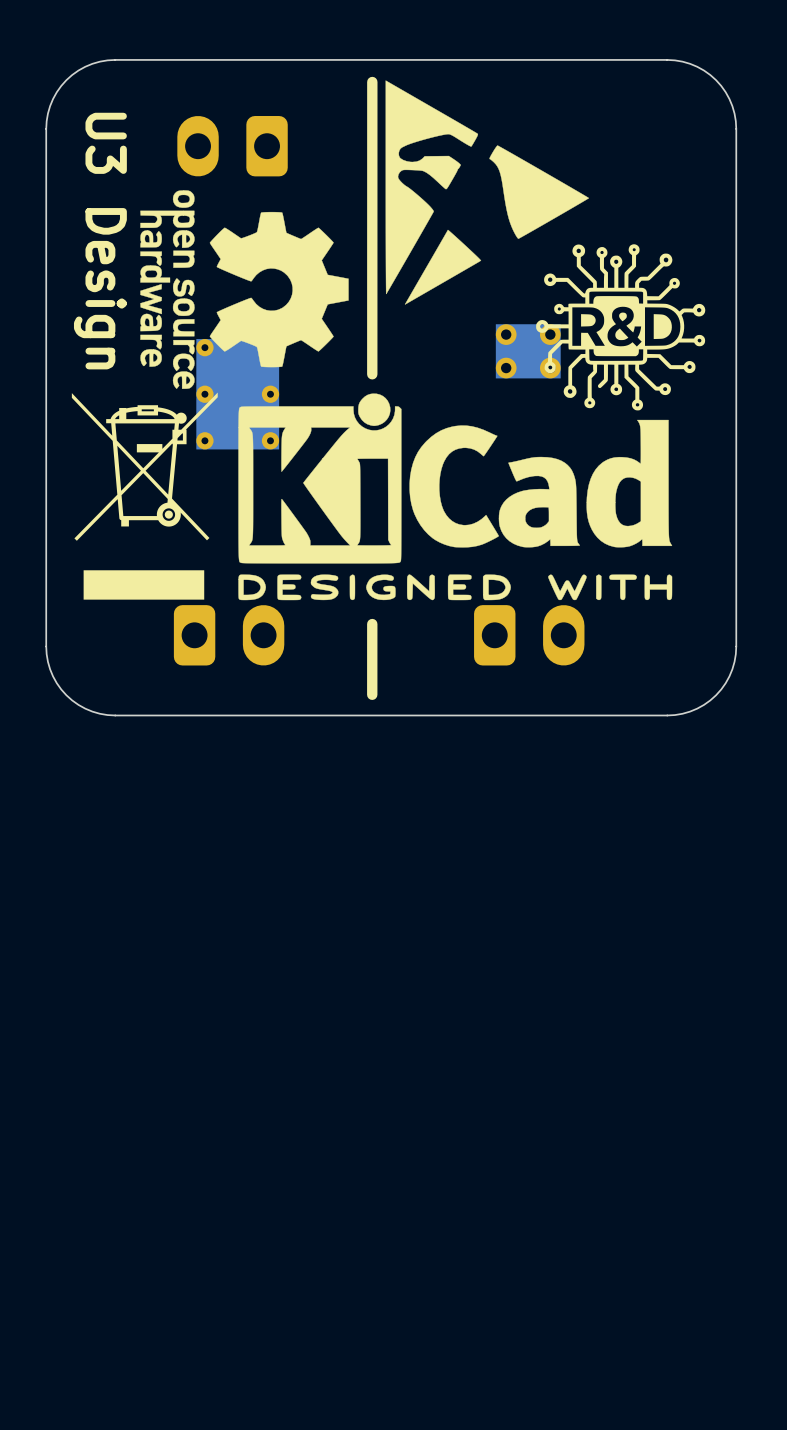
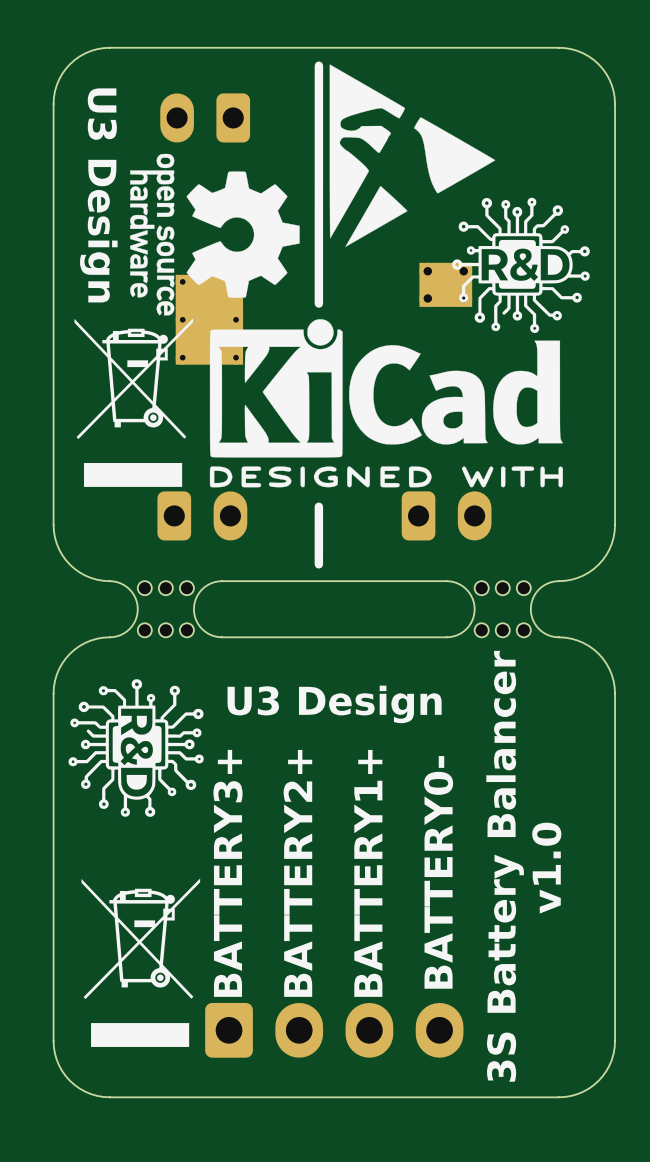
board edge: (253, 715) (115, 715) -> (222, 581) (211, 583) (202, 589) (196, 598) (193, 609) (196, 619) (202, 629) (211, 635) (222, 637) (453, 636) (468, 626) (473, 616) (474, 605) (466, 589) (457, 583) (446, 581)
board edge: (667, 715) (529, 715) -> (558, 581) (544, 584) (534, 595) (530, 609) (534, 623) (548, 635) (577, 640) (593, 649) (609, 669) (615, 693) (614, 1047) (609, 1065) (598, 1080) (583, 1091) (558, 1097) (109, 1097) (85, 1091) (65, 1076) (56, 1059) (53, 1041) (53, 687) (59, 669) (74, 649) (91, 640) (120, 635) (134, 623) (137, 609) (134, 595) (123, 584) (109, 581)
part: none -> (165, 609)
part: none -> (502, 609)
drawing: none -> [68, 679, 204, 817]
text: none -> U3 Design (334, 704)
text: none -> 3S Battery Balancer (505, 866)
text: none -> v1.0 (546, 868)
text: none -> BATTERY3+ (228, 873)
text: none -> BATTERY2+ (297, 873)
text: none -> BATTERY1+ (368, 873)
text: none -> BATTERY0- (438, 872)
drawing: none -> [81, 878, 201, 1047]
part: none -> (334, 1030)

